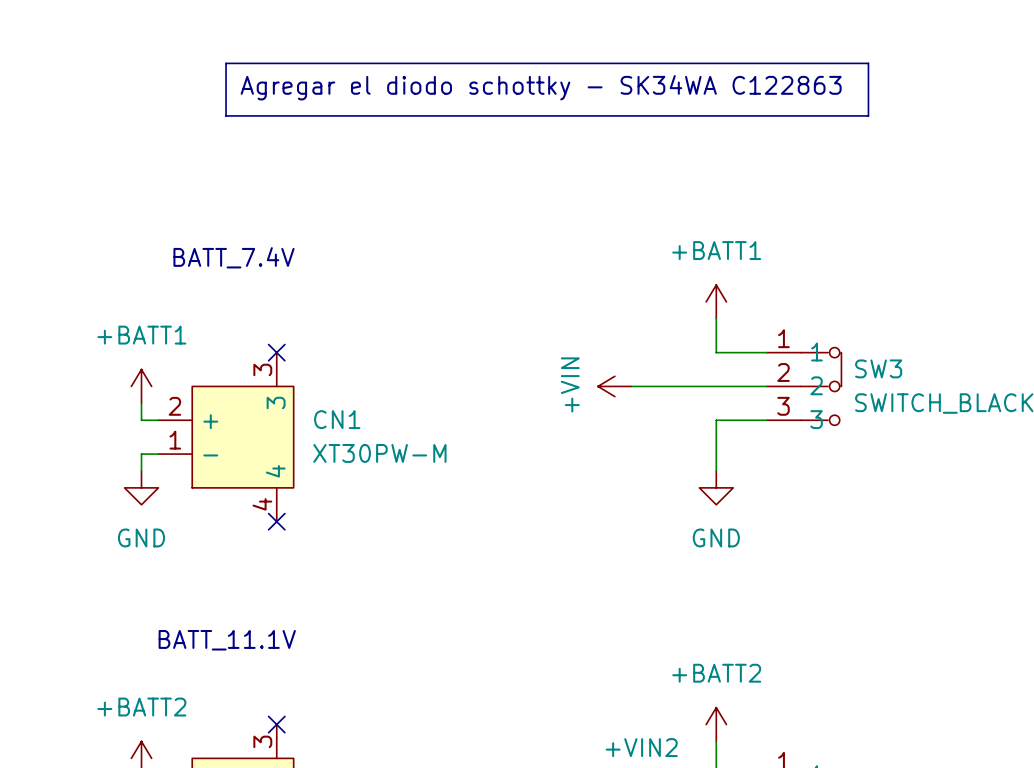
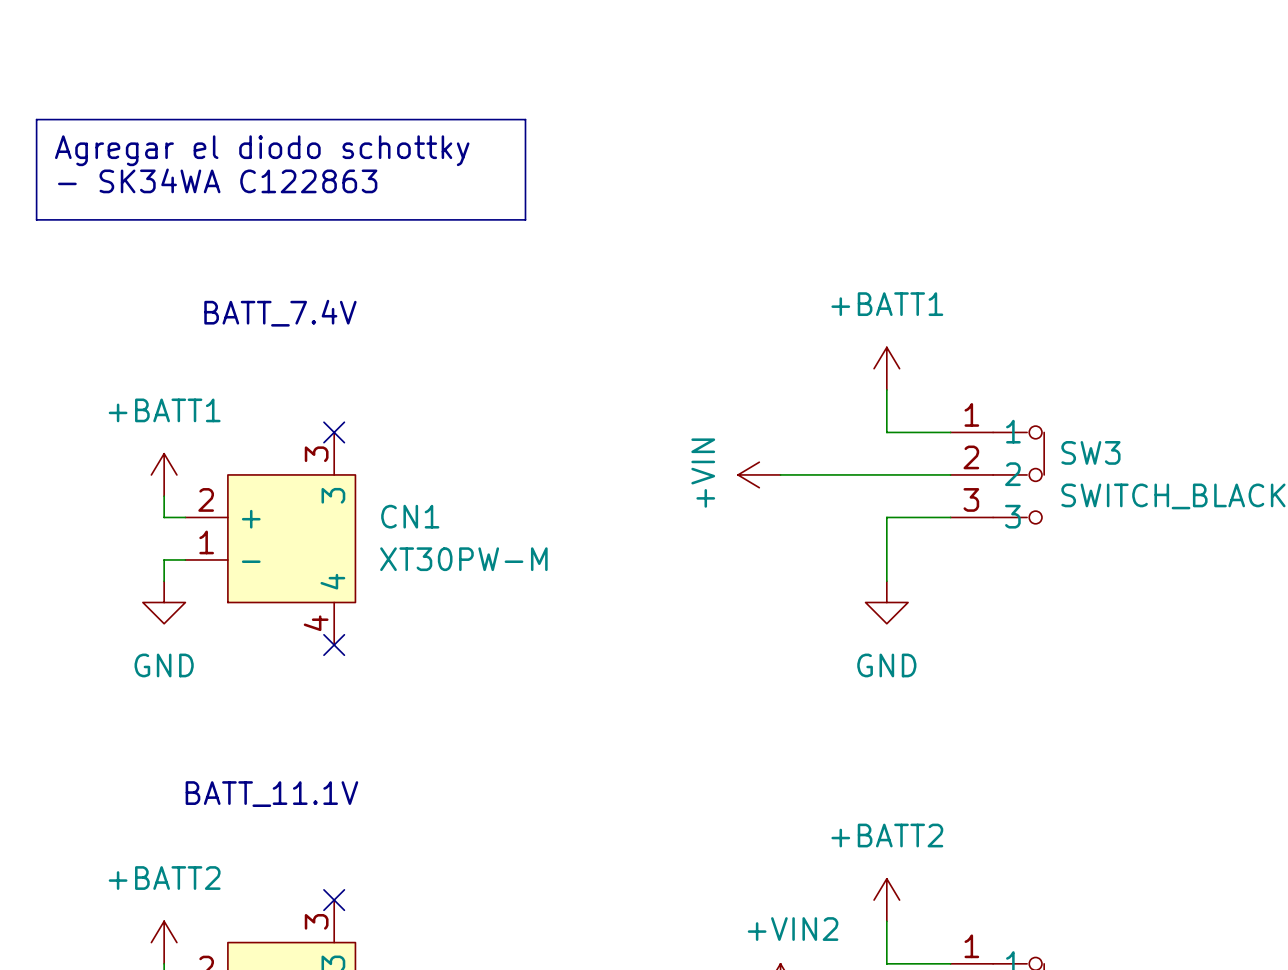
line: (226, 63) (868, 63) (868, 115) (226, 115) (226, 63) -> none
text: Agregar el diodo schottky - SK34WA C122863 (541, 87) -> none
line: none -> (36, 119) (525, 119) (525, 219) (36, 219) (36, 119)
text: none -> Agregar el diodo schottky (262, 150)
text: none -> - SK34WA C122863 (217, 180)

